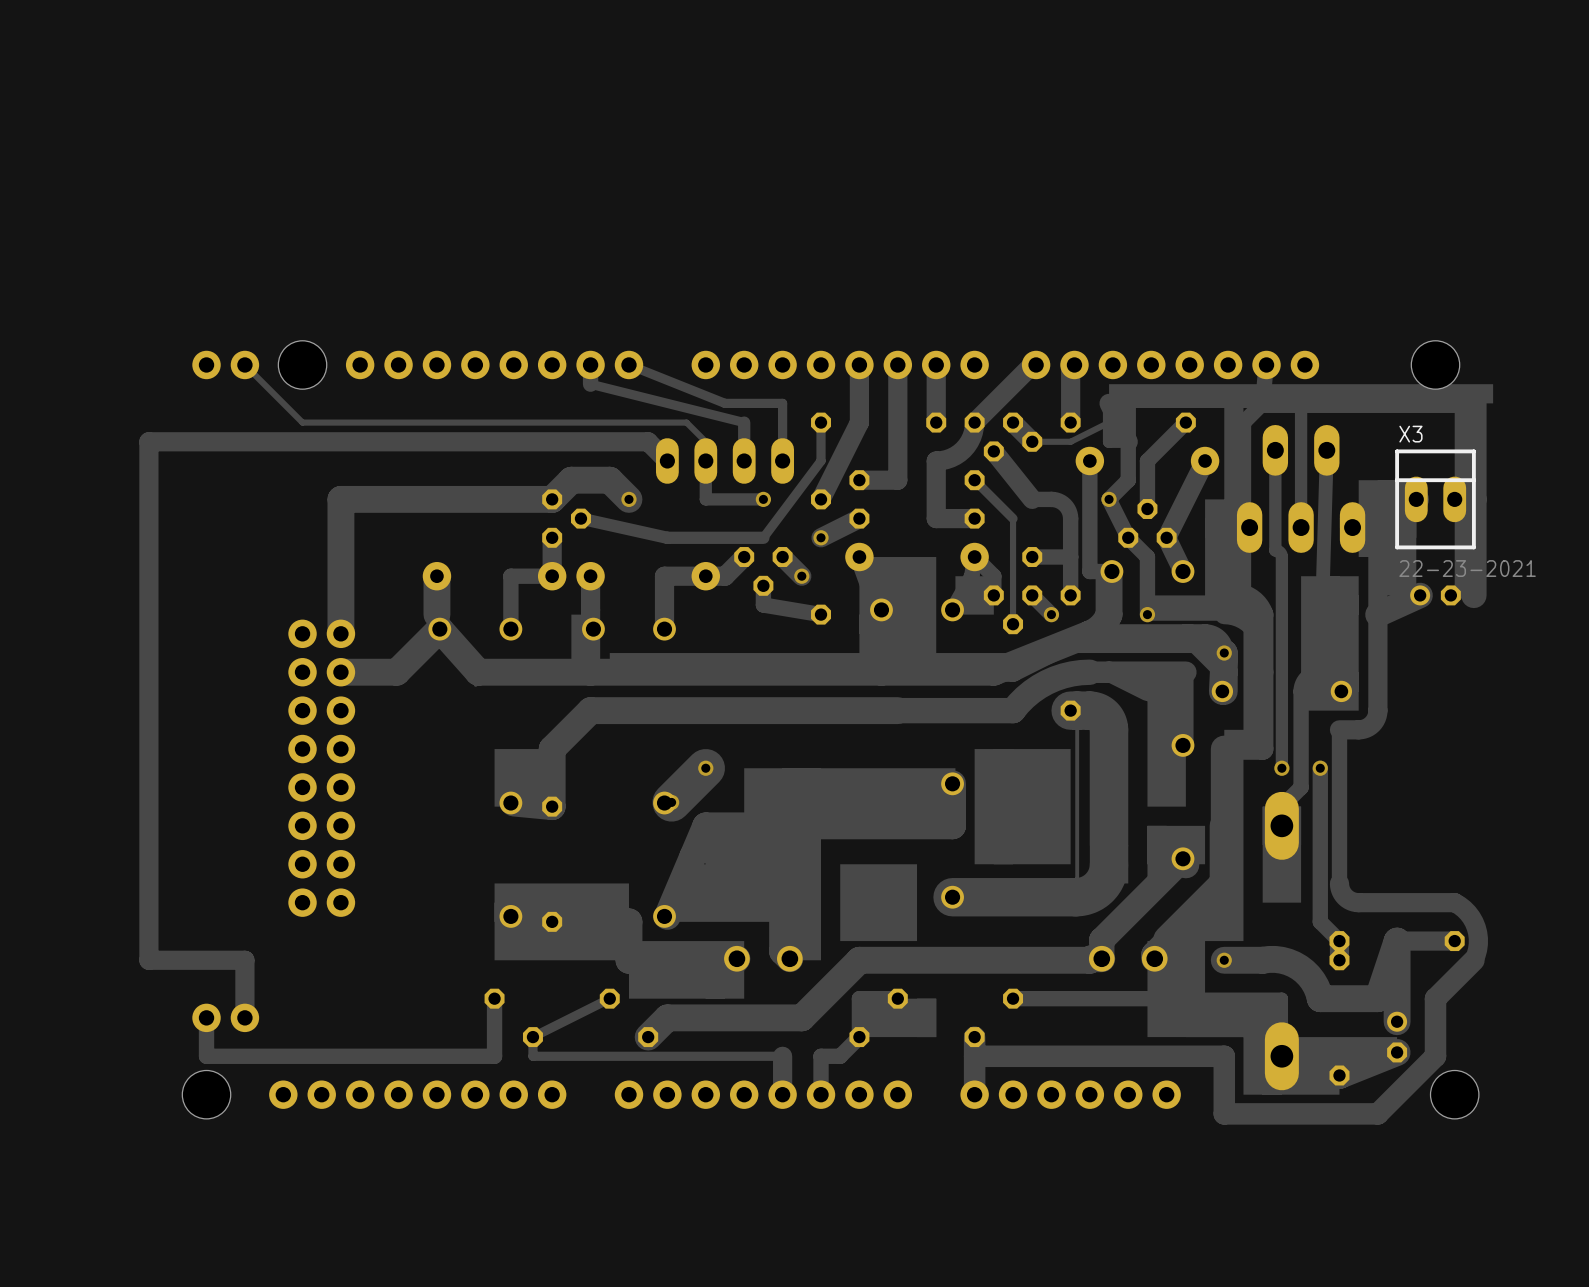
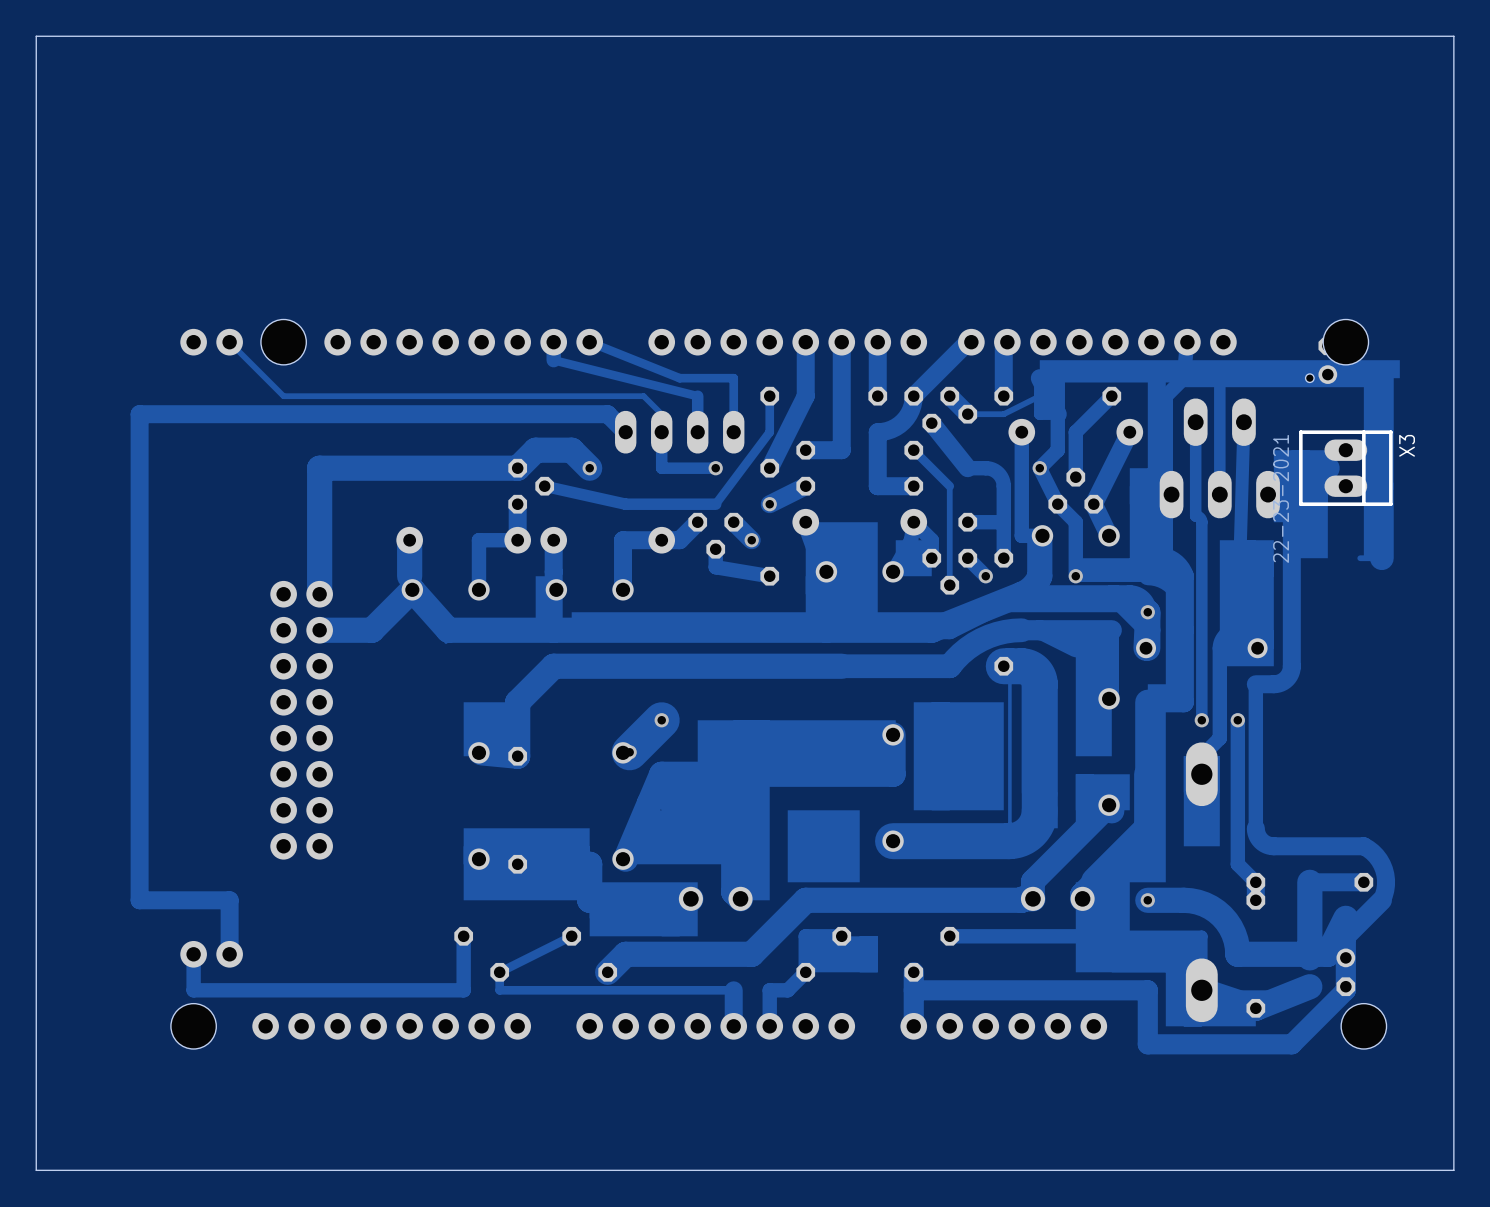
board edge: none -> (1453, 36) (36, 36) (36, 1170) (1453, 1170) (1453, 36)
hole: none -> (1309, 378)
X3 rotation: 0° (1435, 499) -> 90° clockwise (1345, 468)
track: (1420, 595) (1377, 614) -> none
part rotation: 0° (1435, 595) -> 90° counterclockwise (1327, 360)
part position: (1435, 595) -> (1327, 360)
track: (1397, 941) (1377, 998) (1320, 998) (1312, 981) (1299, 967) (1281, 960) (1262, 960) -> (1345, 918) (1327, 954) (1237, 954) (1233, 933) (1222, 916) (1204, 904) (1183, 900)
drawing: [1281, 1037, 1398, 1057] -> none
part position: (1397, 1037) -> (1345, 972)

